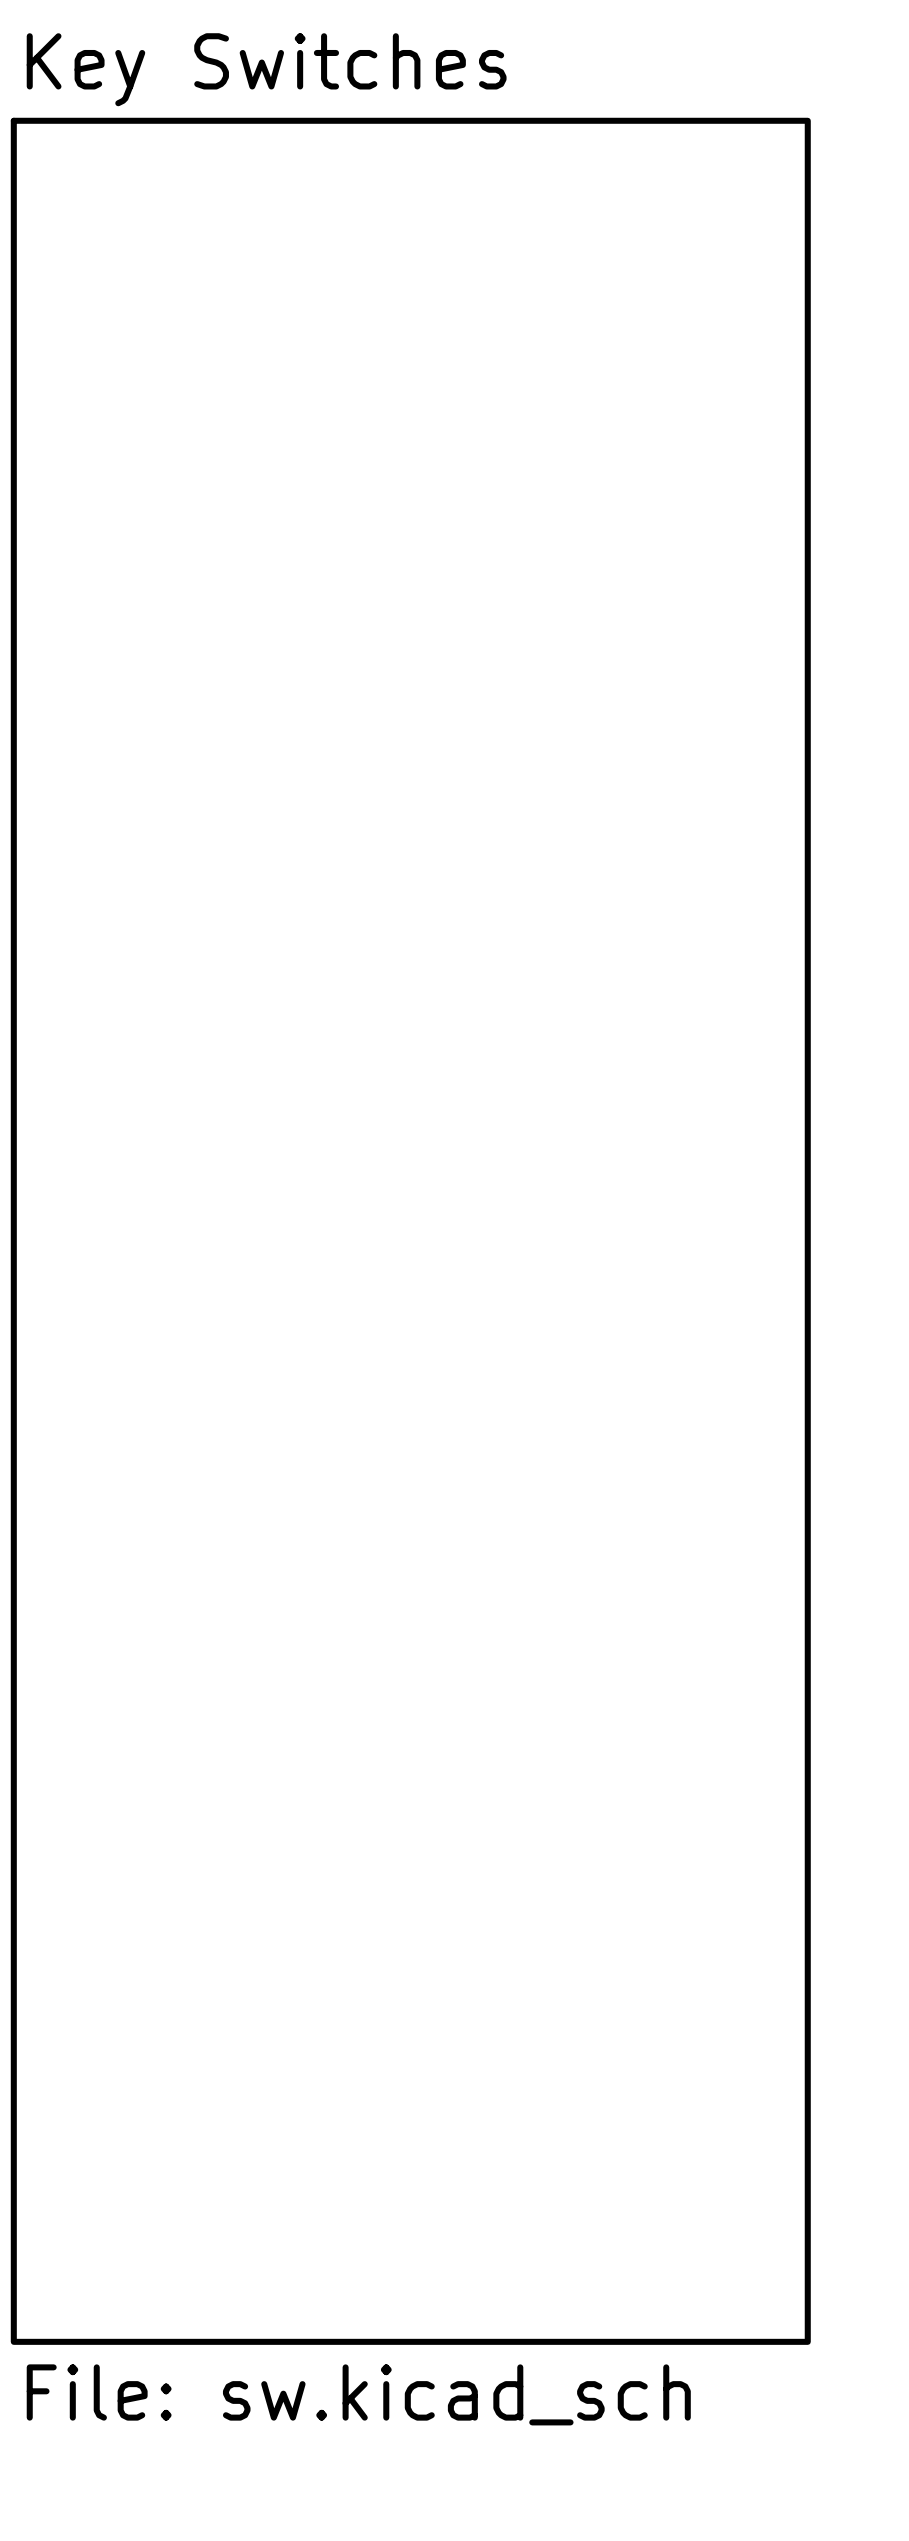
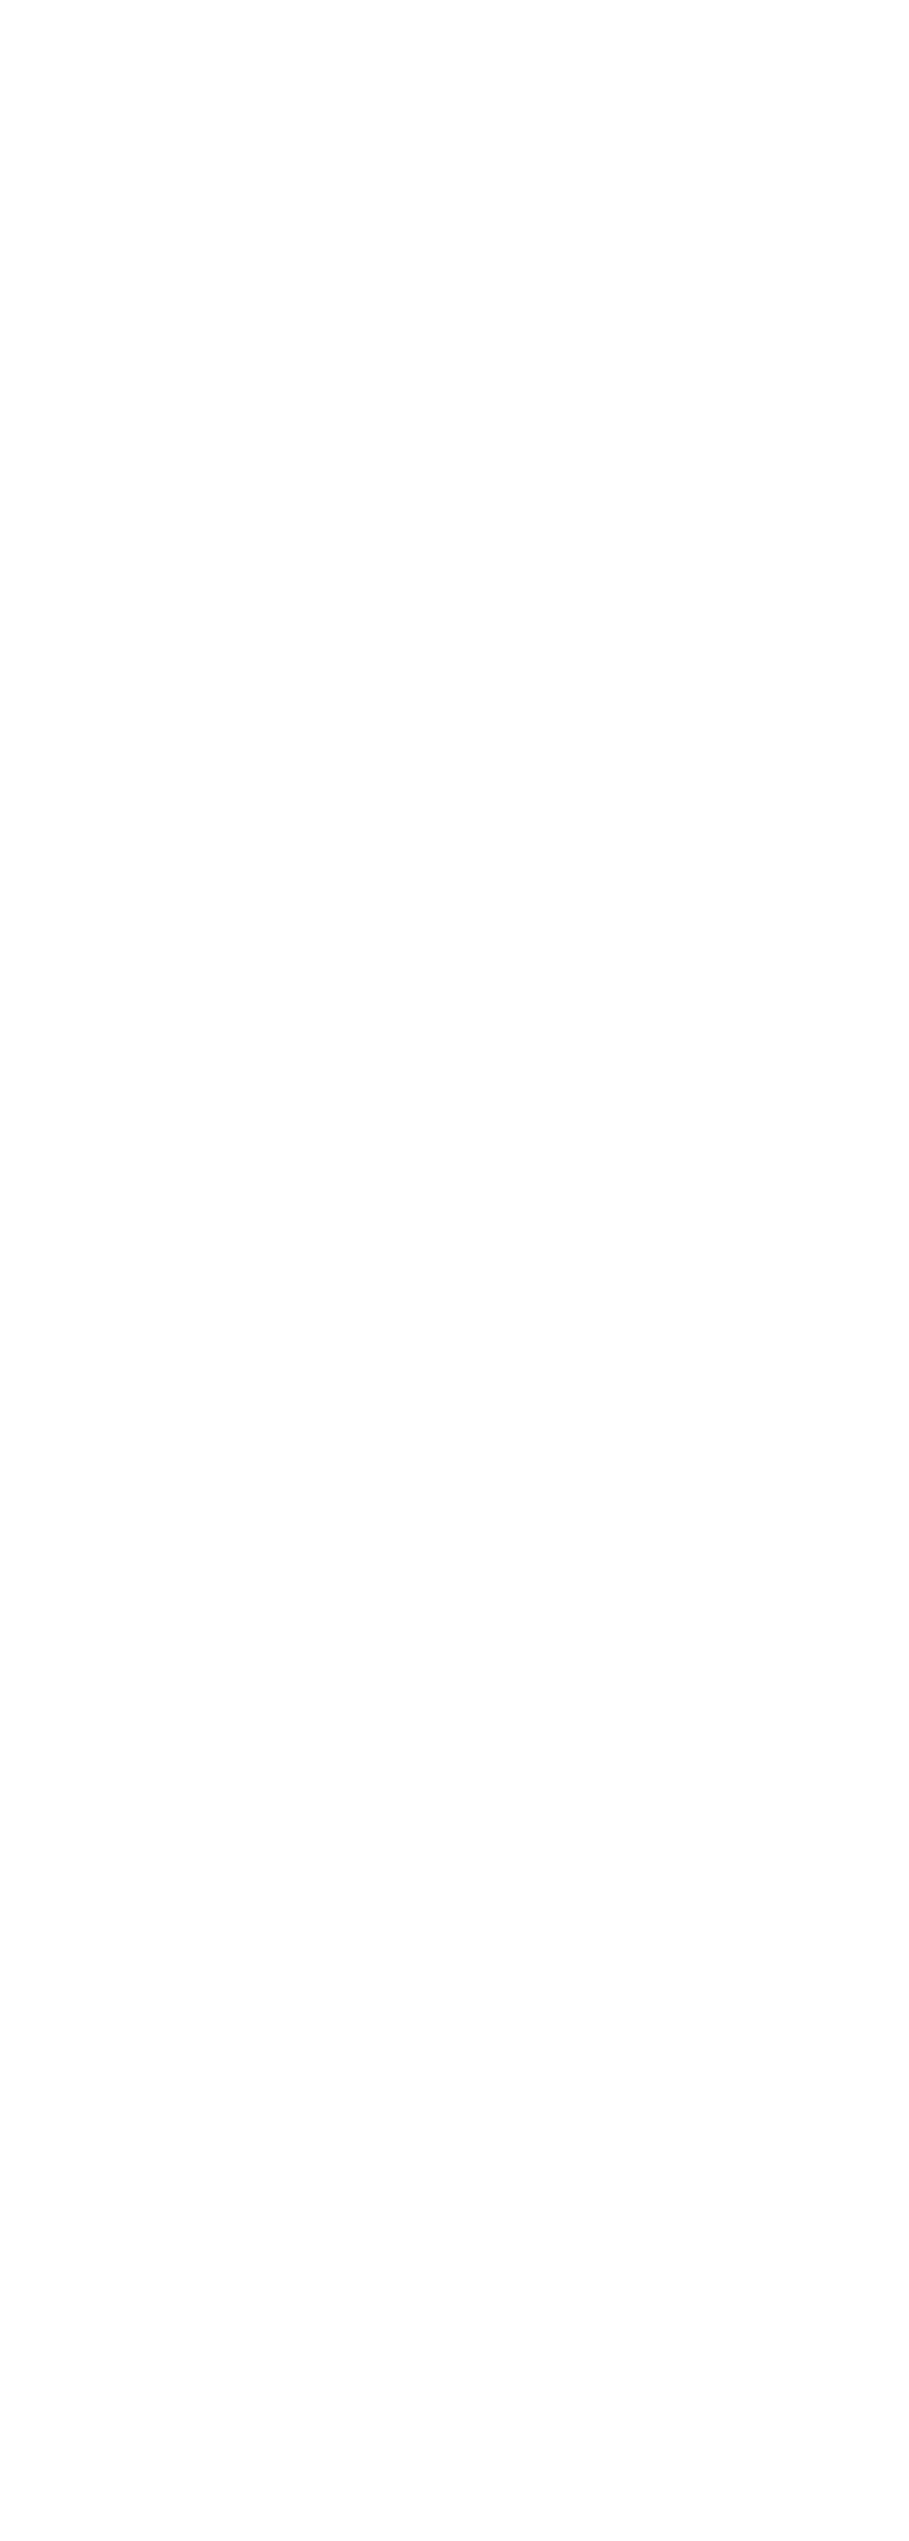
sheet Key Switches: File: sw.kicad_sch (410, 1231) -> none

